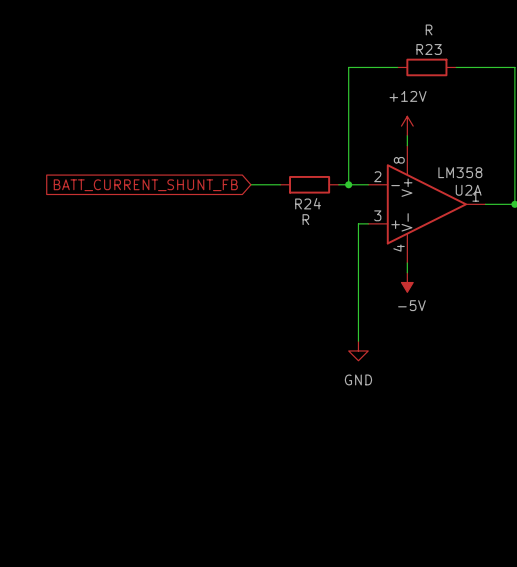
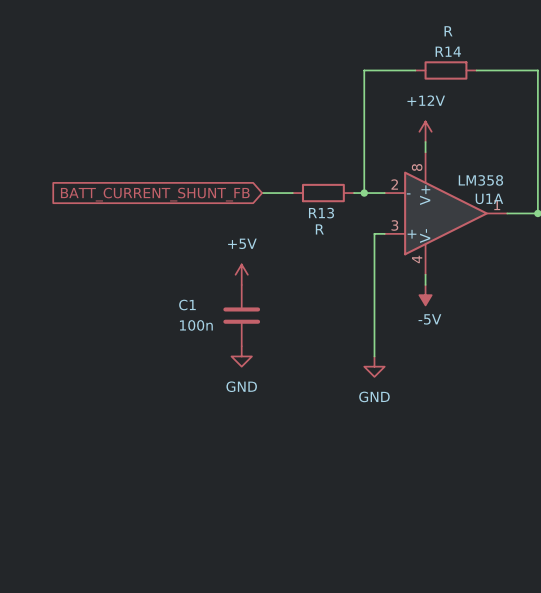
R23 name: R23 (429, 49) -> R14 (448, 51)
U2A name: U2A (468, 190) -> U1A (489, 198)
R24 name: R24 (308, 203) -> R13 (321, 213)
power symbol: none -> +5V (241, 274)
C1: none -> 100n (241, 315)
power symbol: none -> GND (241, 356)

